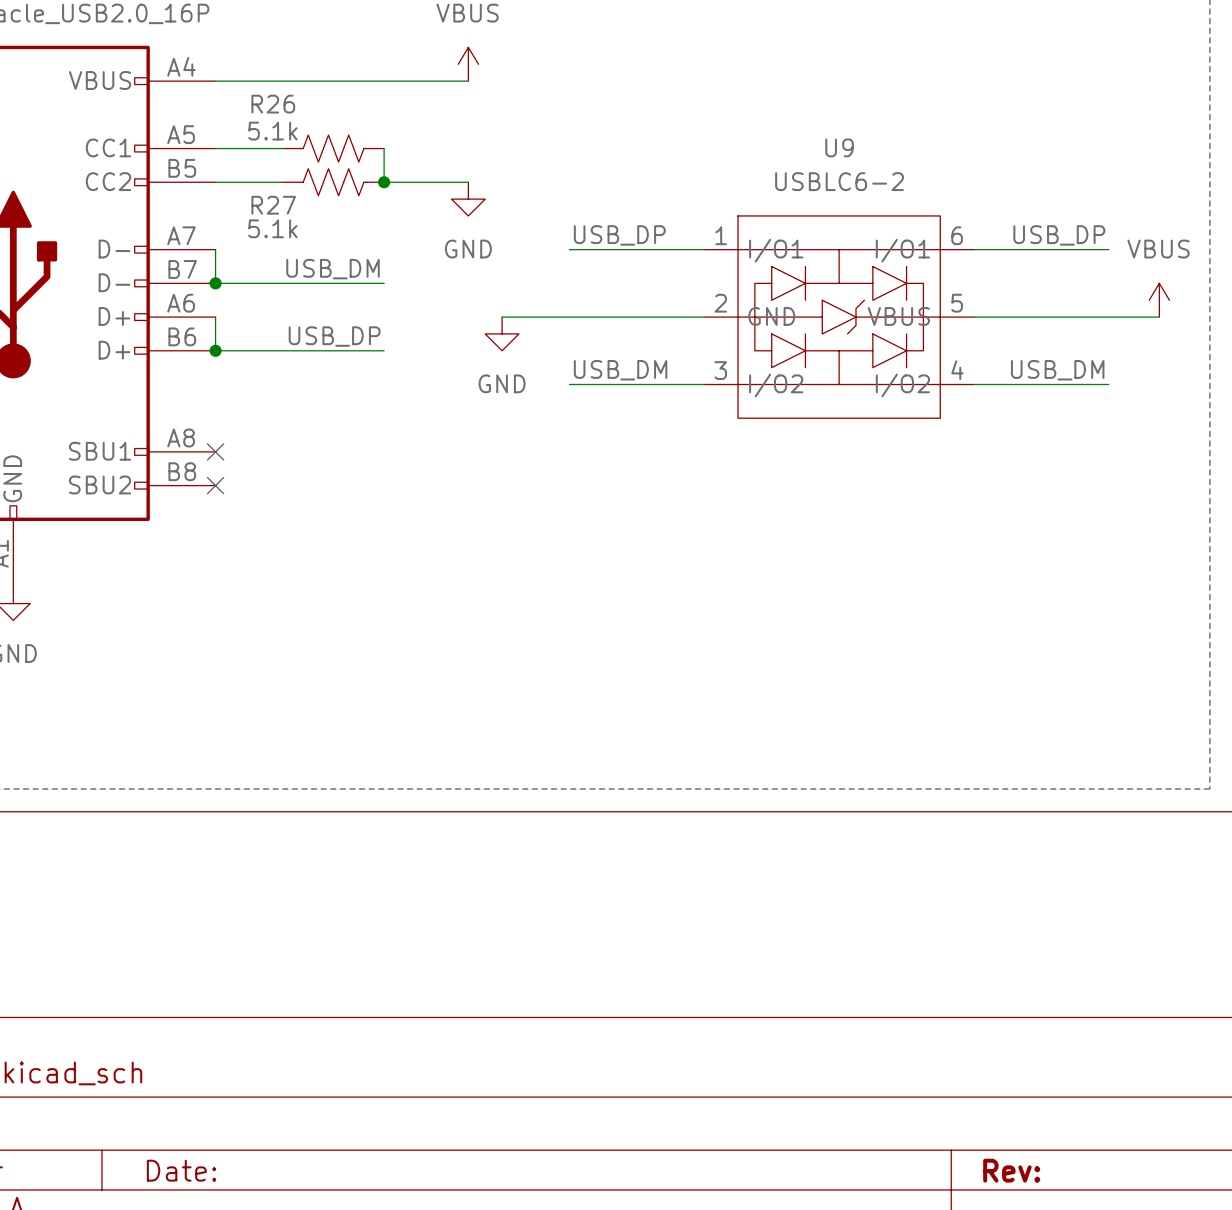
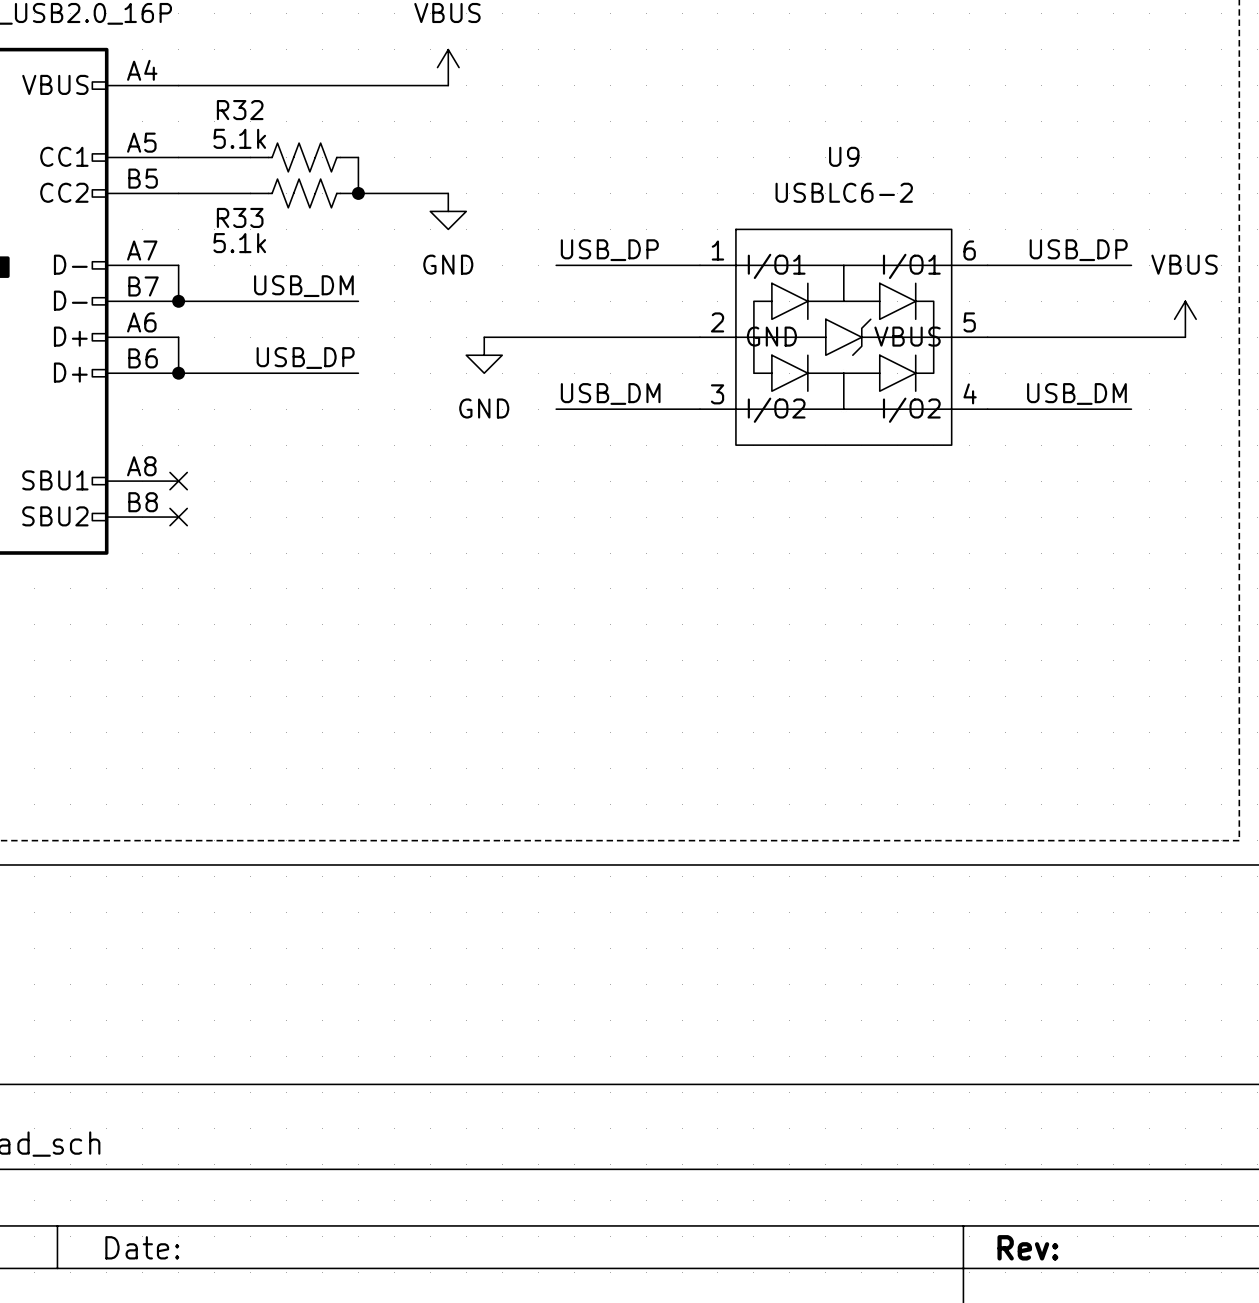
R26 name: R26 (273, 104) -> R32 (240, 110)
R27 name: R27 (273, 205) -> R33 (240, 217)

